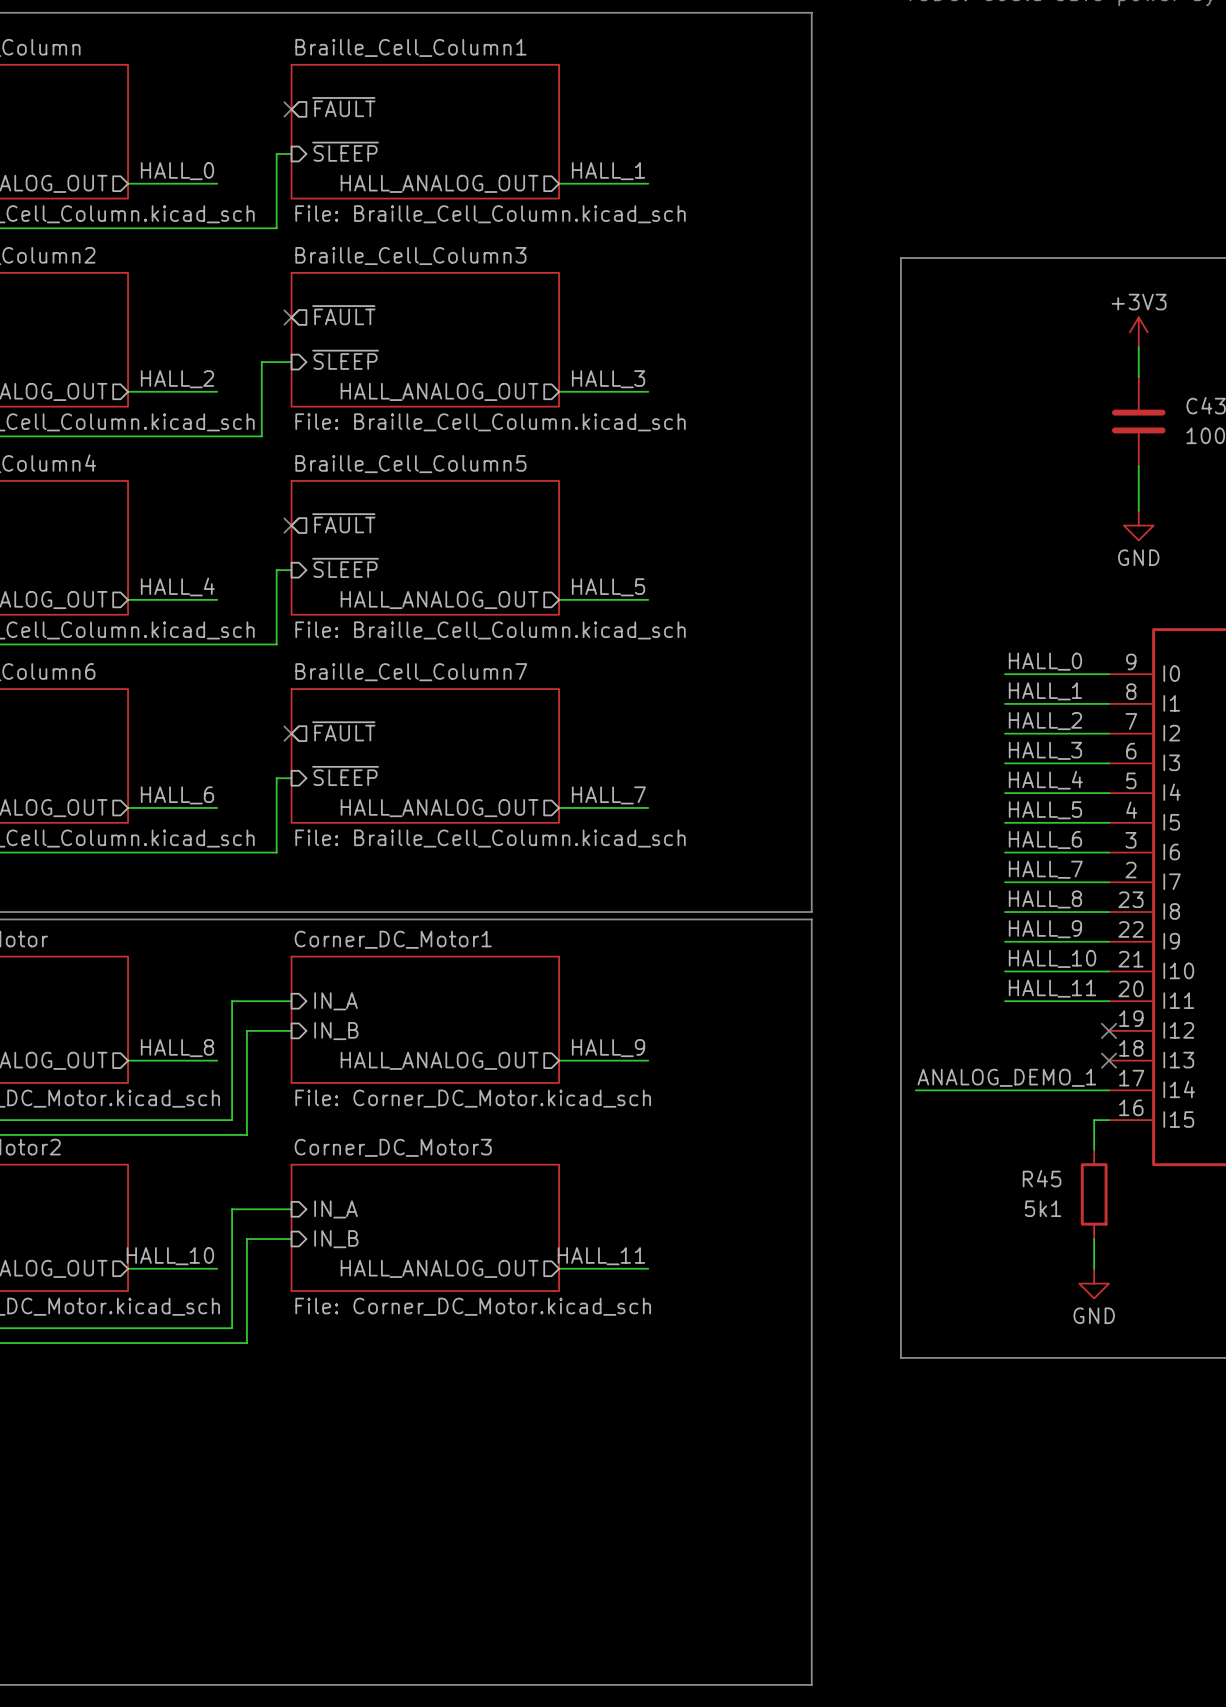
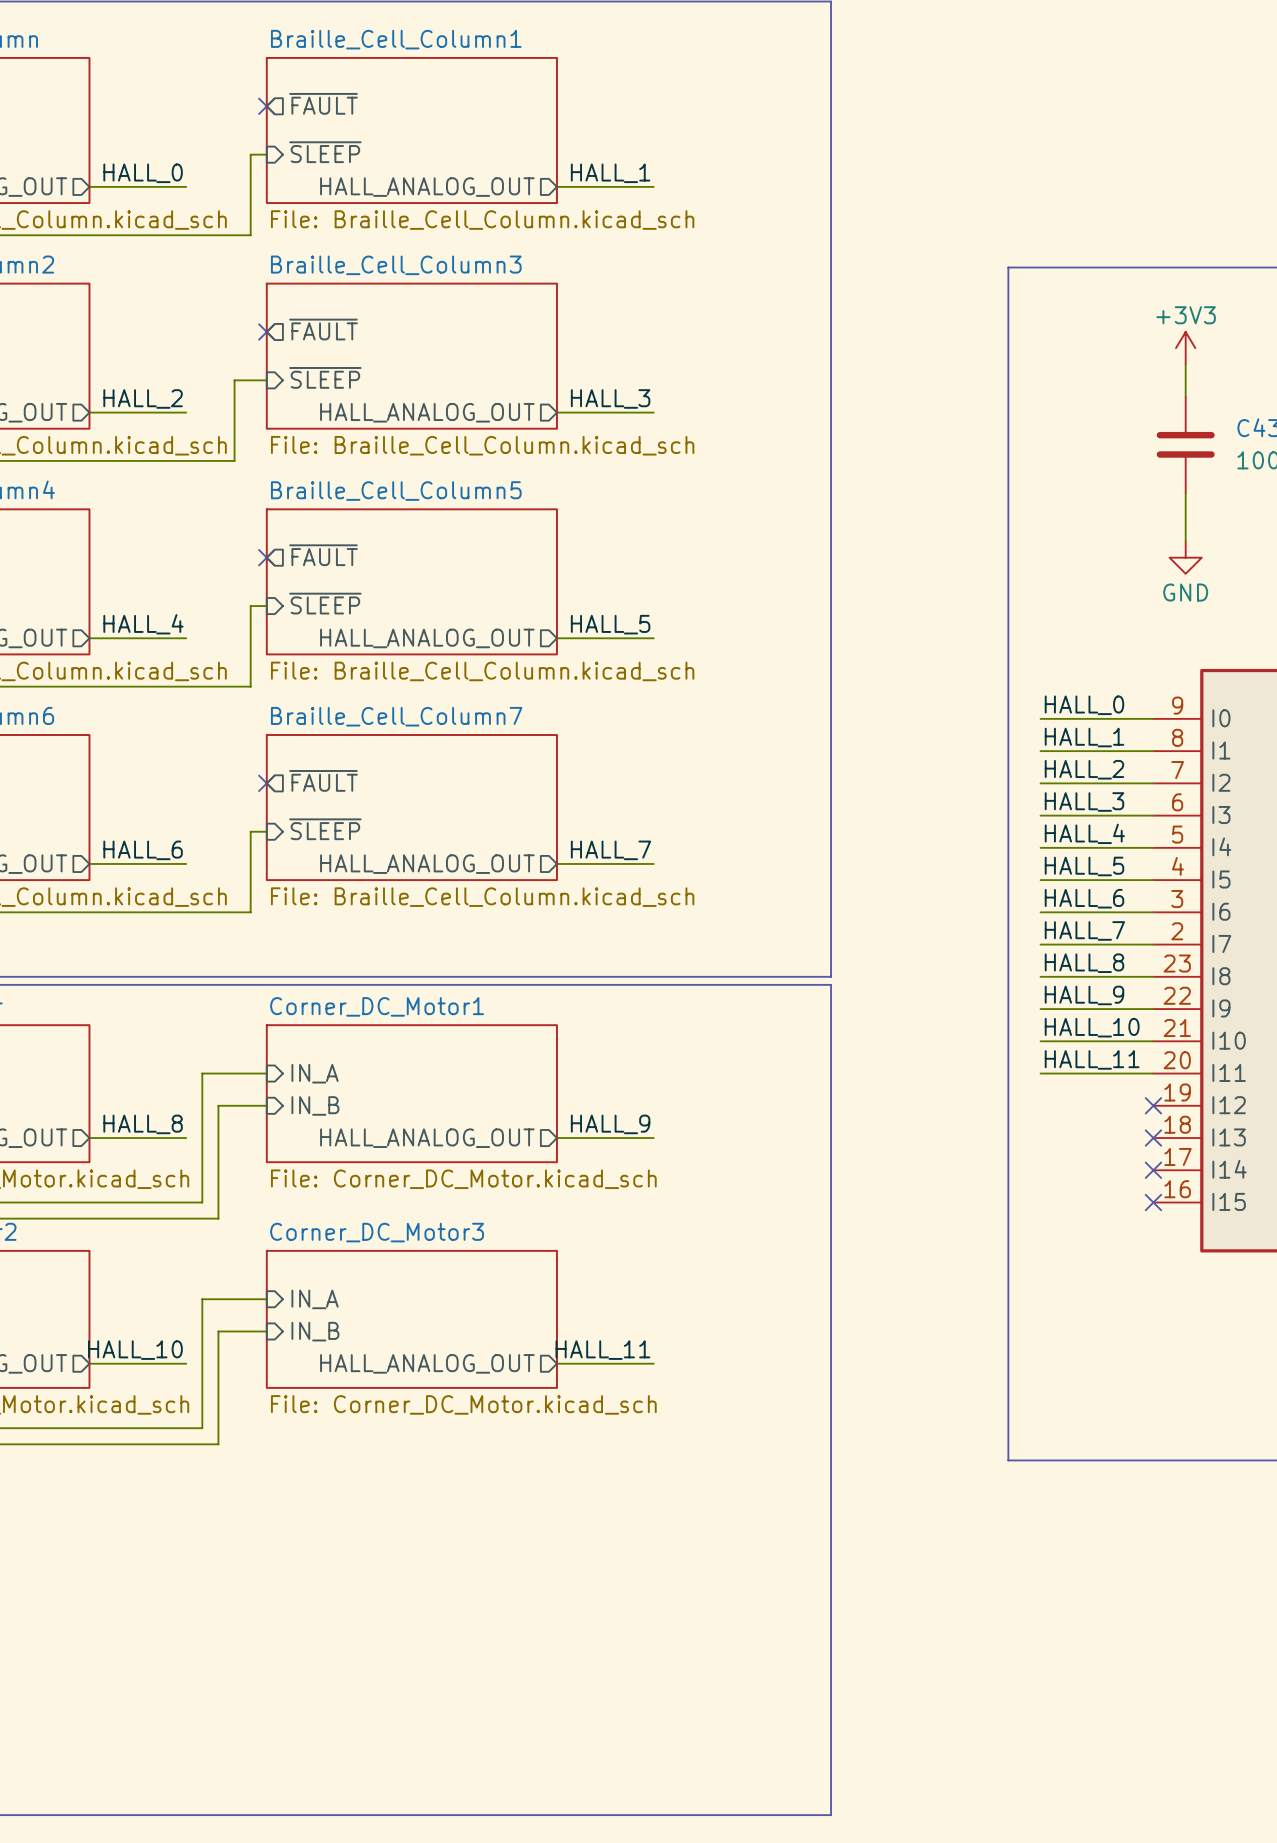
line: (975, 258) (900, 258) (900, 1357) (975, 1357) -> (1008, 267) (1008, 1460)
label: ANALOG_DEMO_1 (1006, 1077) -> none
wire: (915, 1090) (1109, 1090) -> none
no-connect mark: none -> (1153, 1170)
wire: (1109, 1120) (1094, 1120) (1094, 1149) -> none
no-connect mark: none -> (1153, 1202)
R45: 5k1 (1094, 1194) -> none
wire: (1094, 1239) (1094, 1268) -> none
power symbol: GND (1094, 1283) -> none

